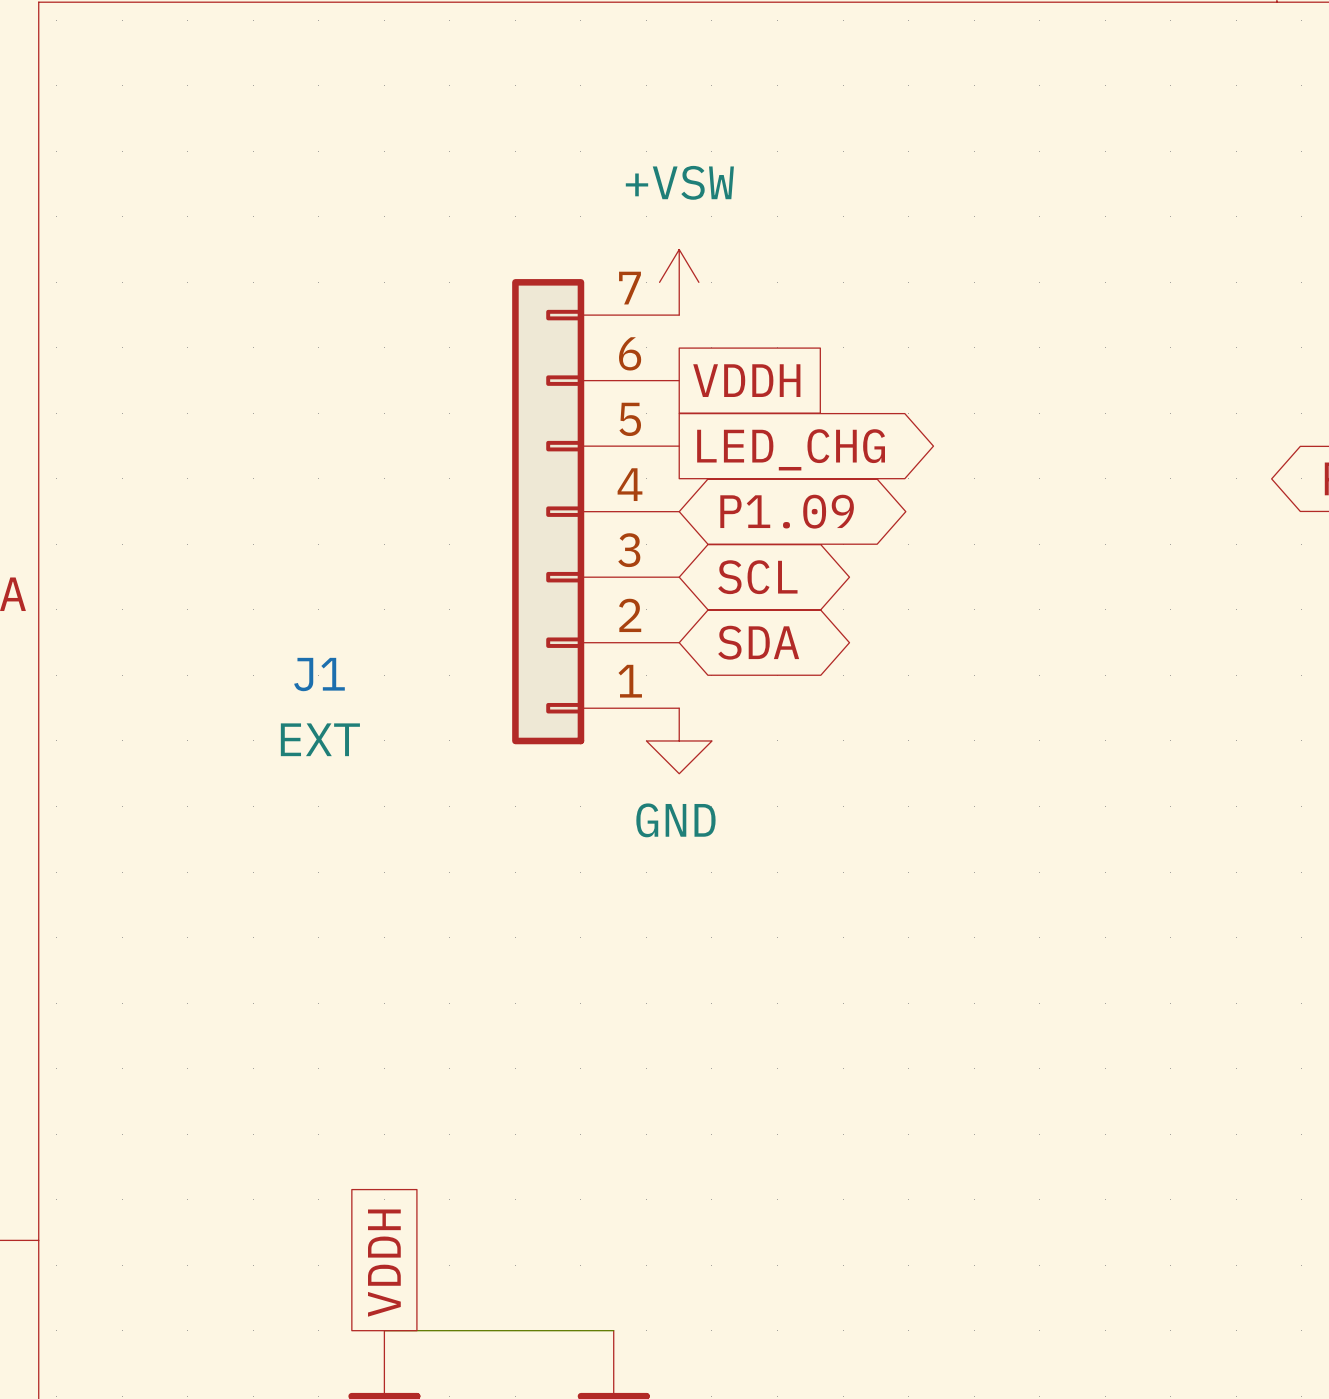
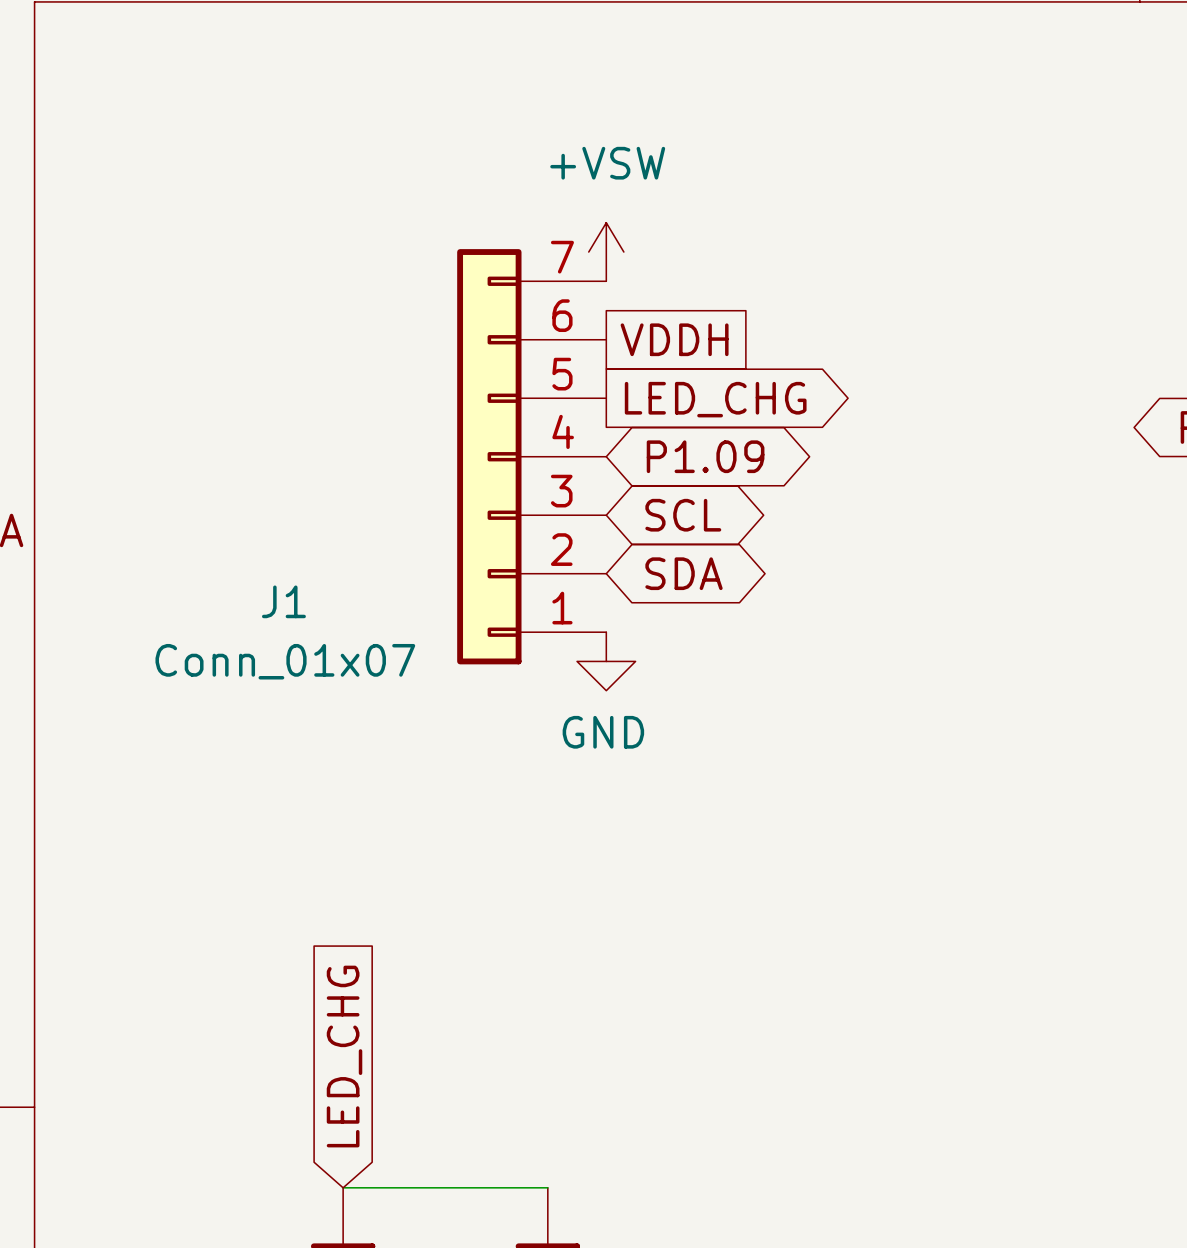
J1 value: EXT (320, 739) -> Conn_01x07 (285, 661)
global label shape: passive (384, 1263) -> input (344, 1056)
global label: VDDH (384, 1263) -> LED_CHG (344, 1056)

